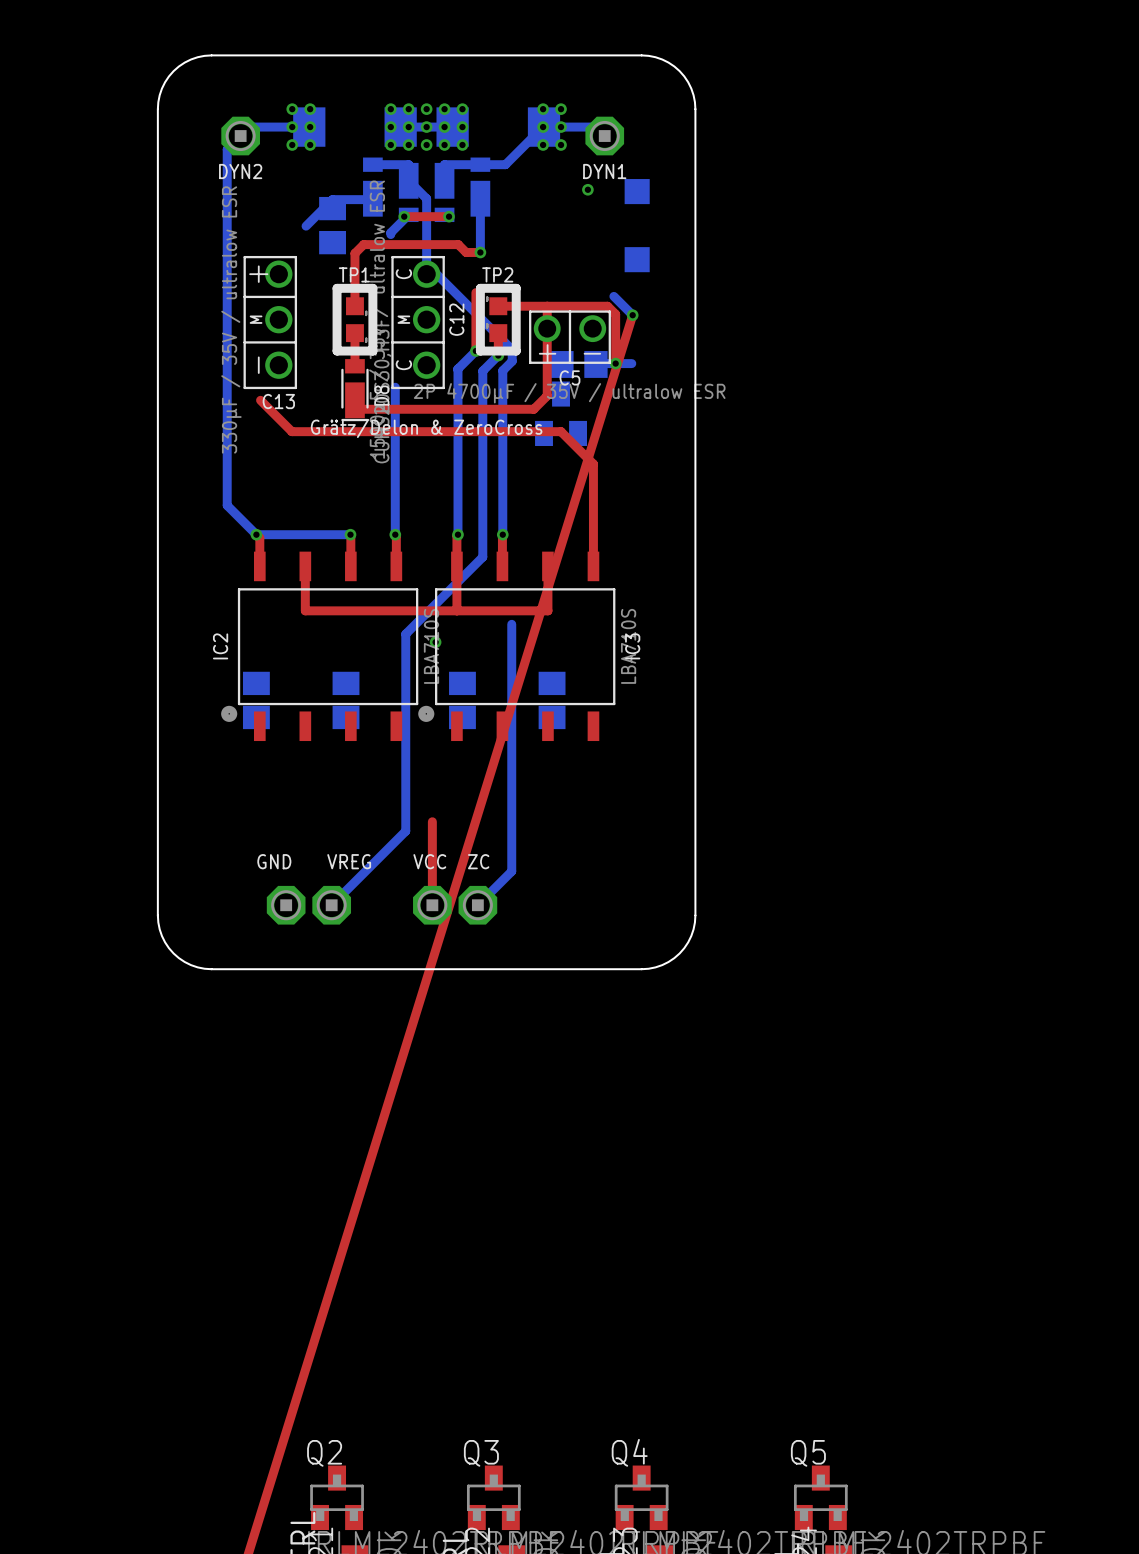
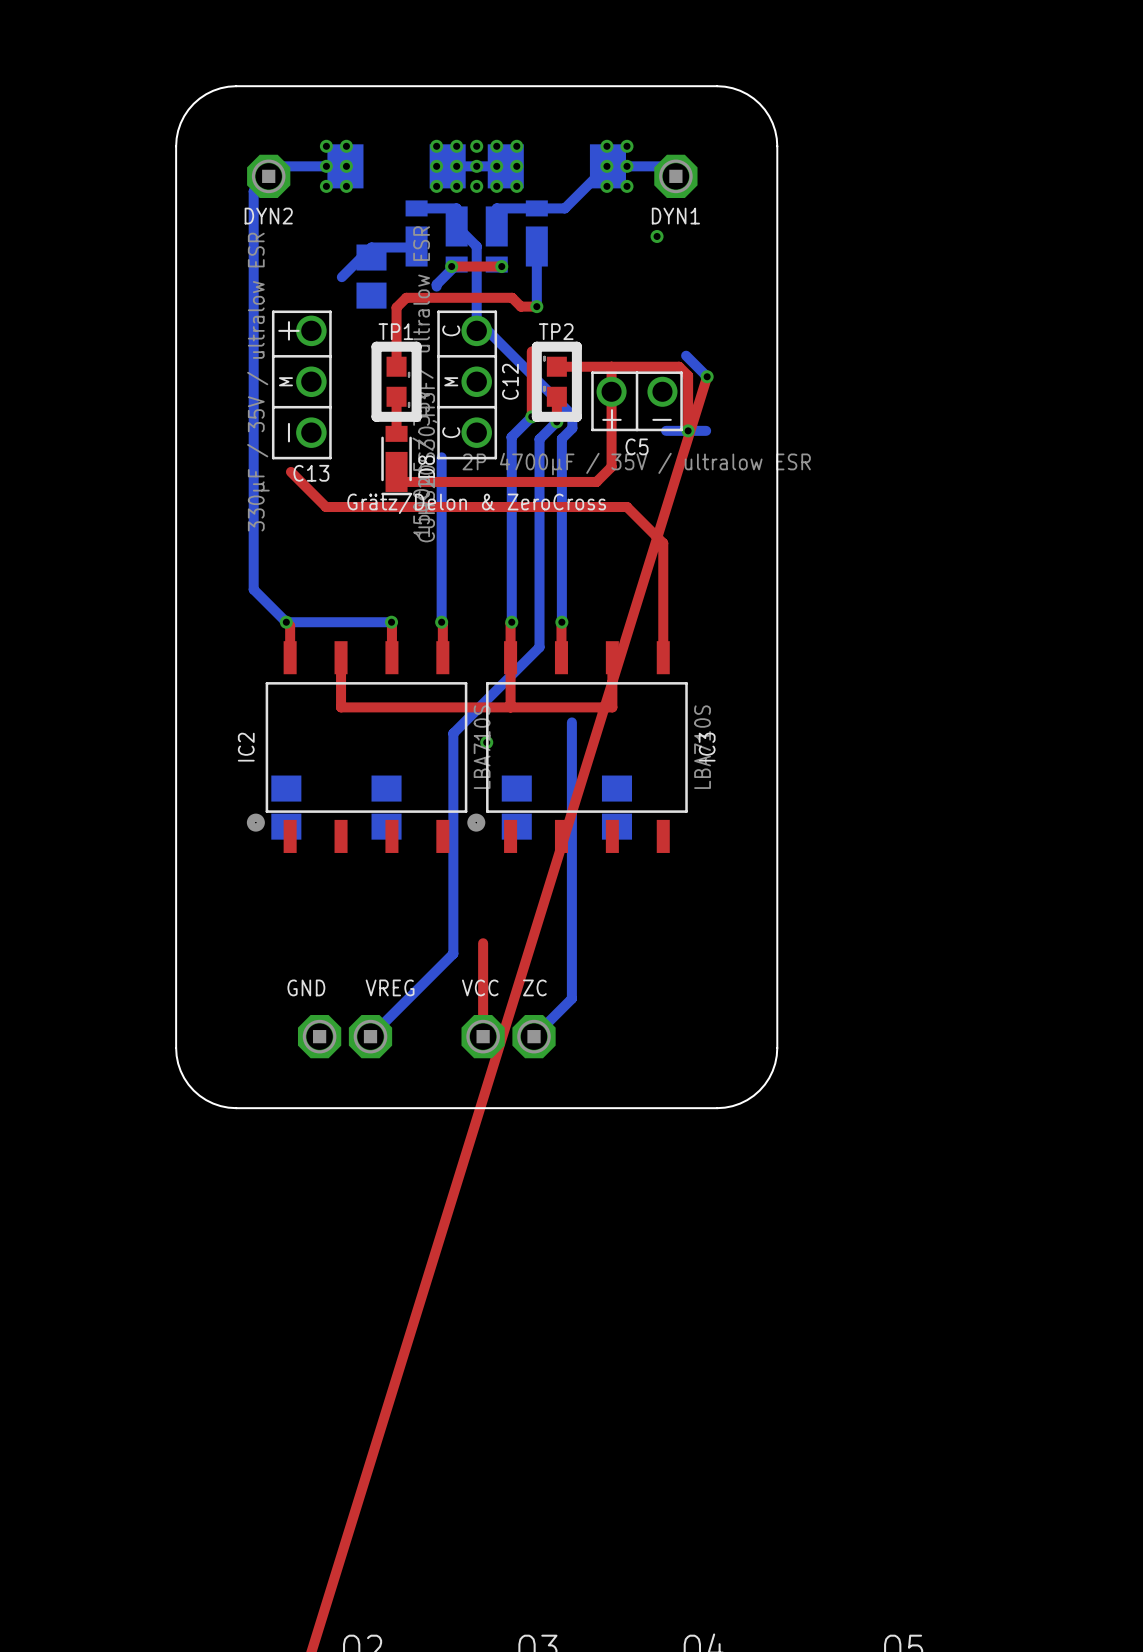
part: (637, 225) -> none
part: (578, 364) -> none
part: (561, 413) -> none

